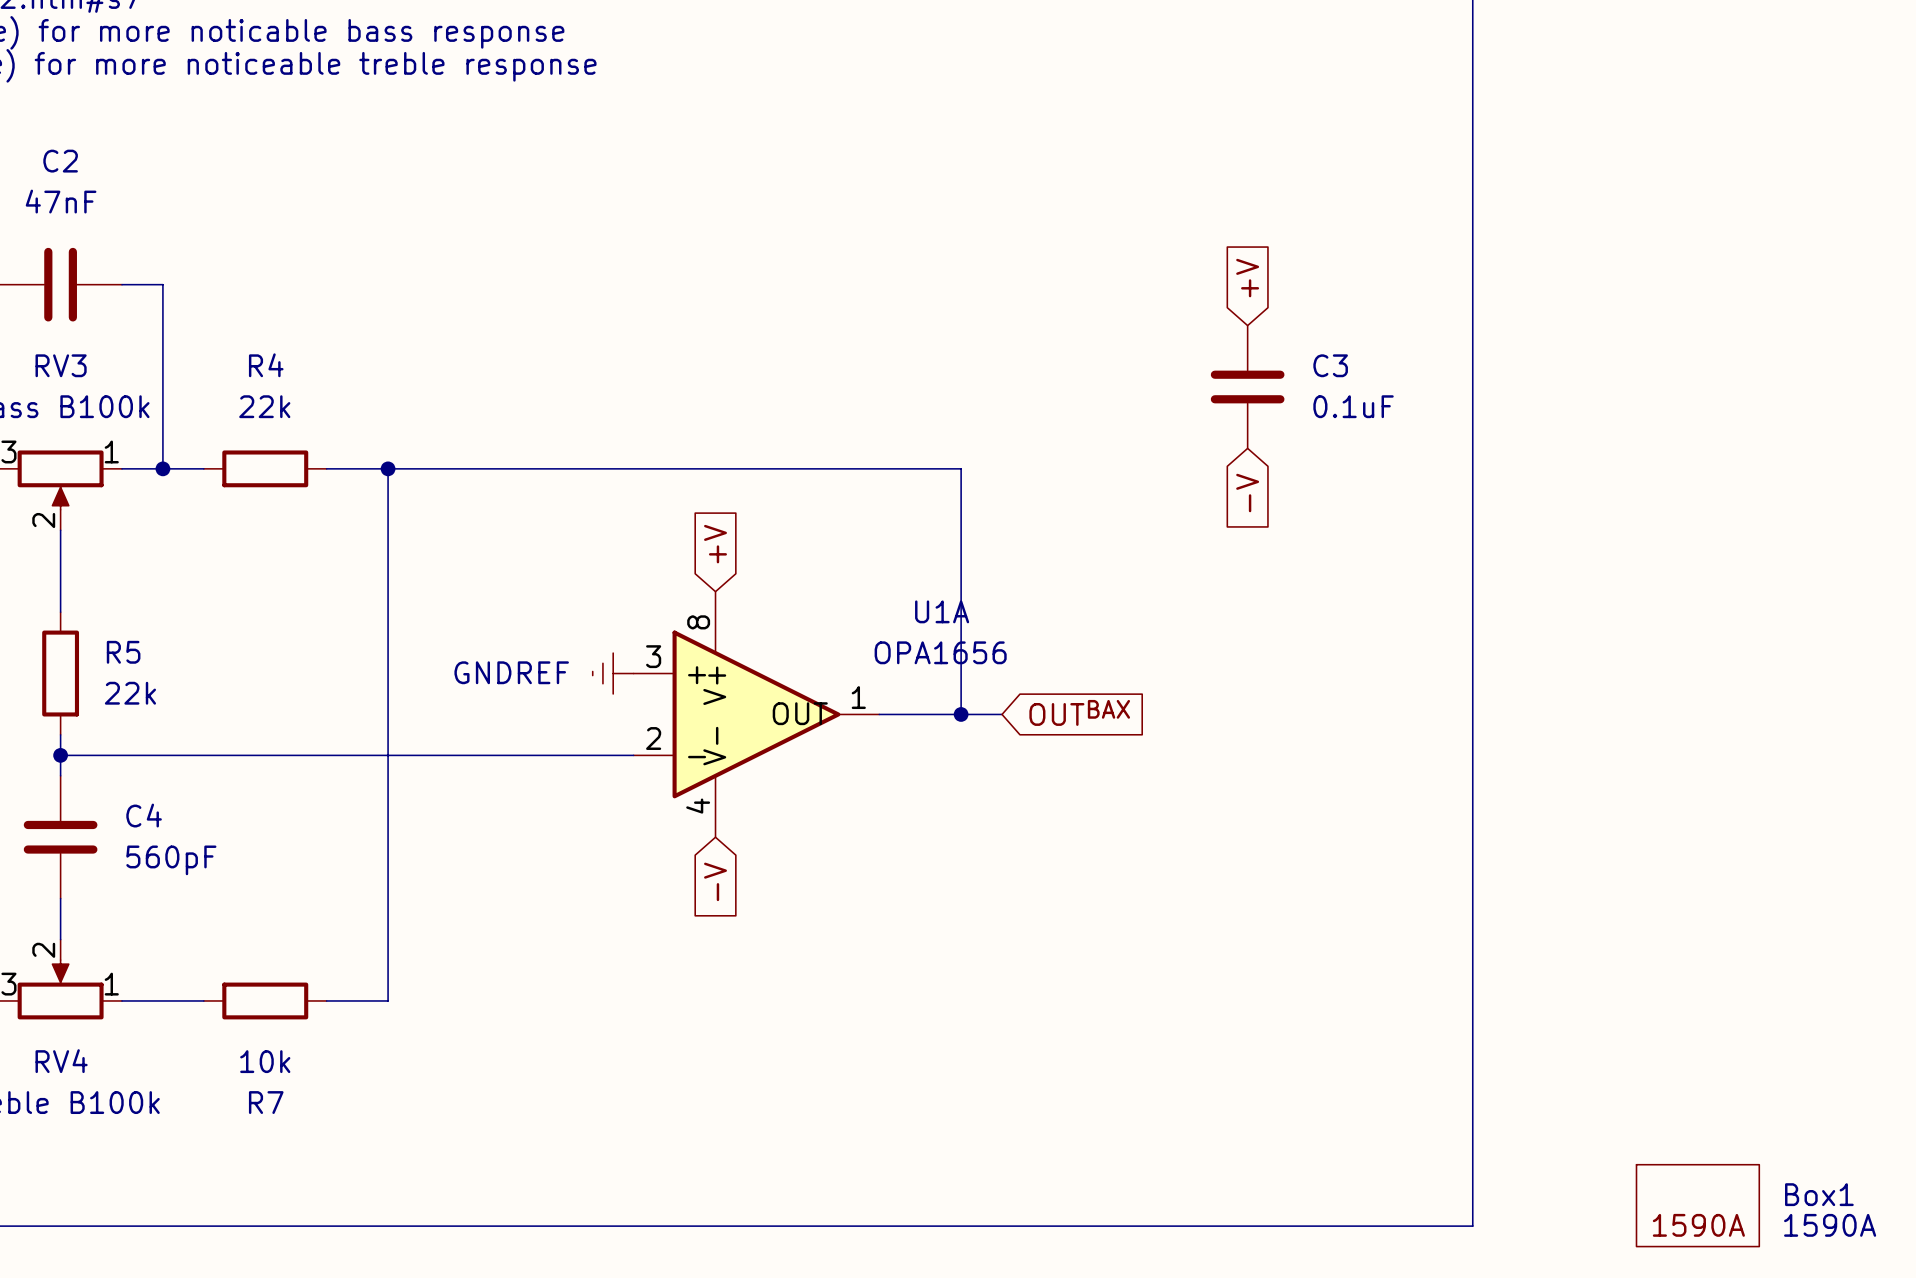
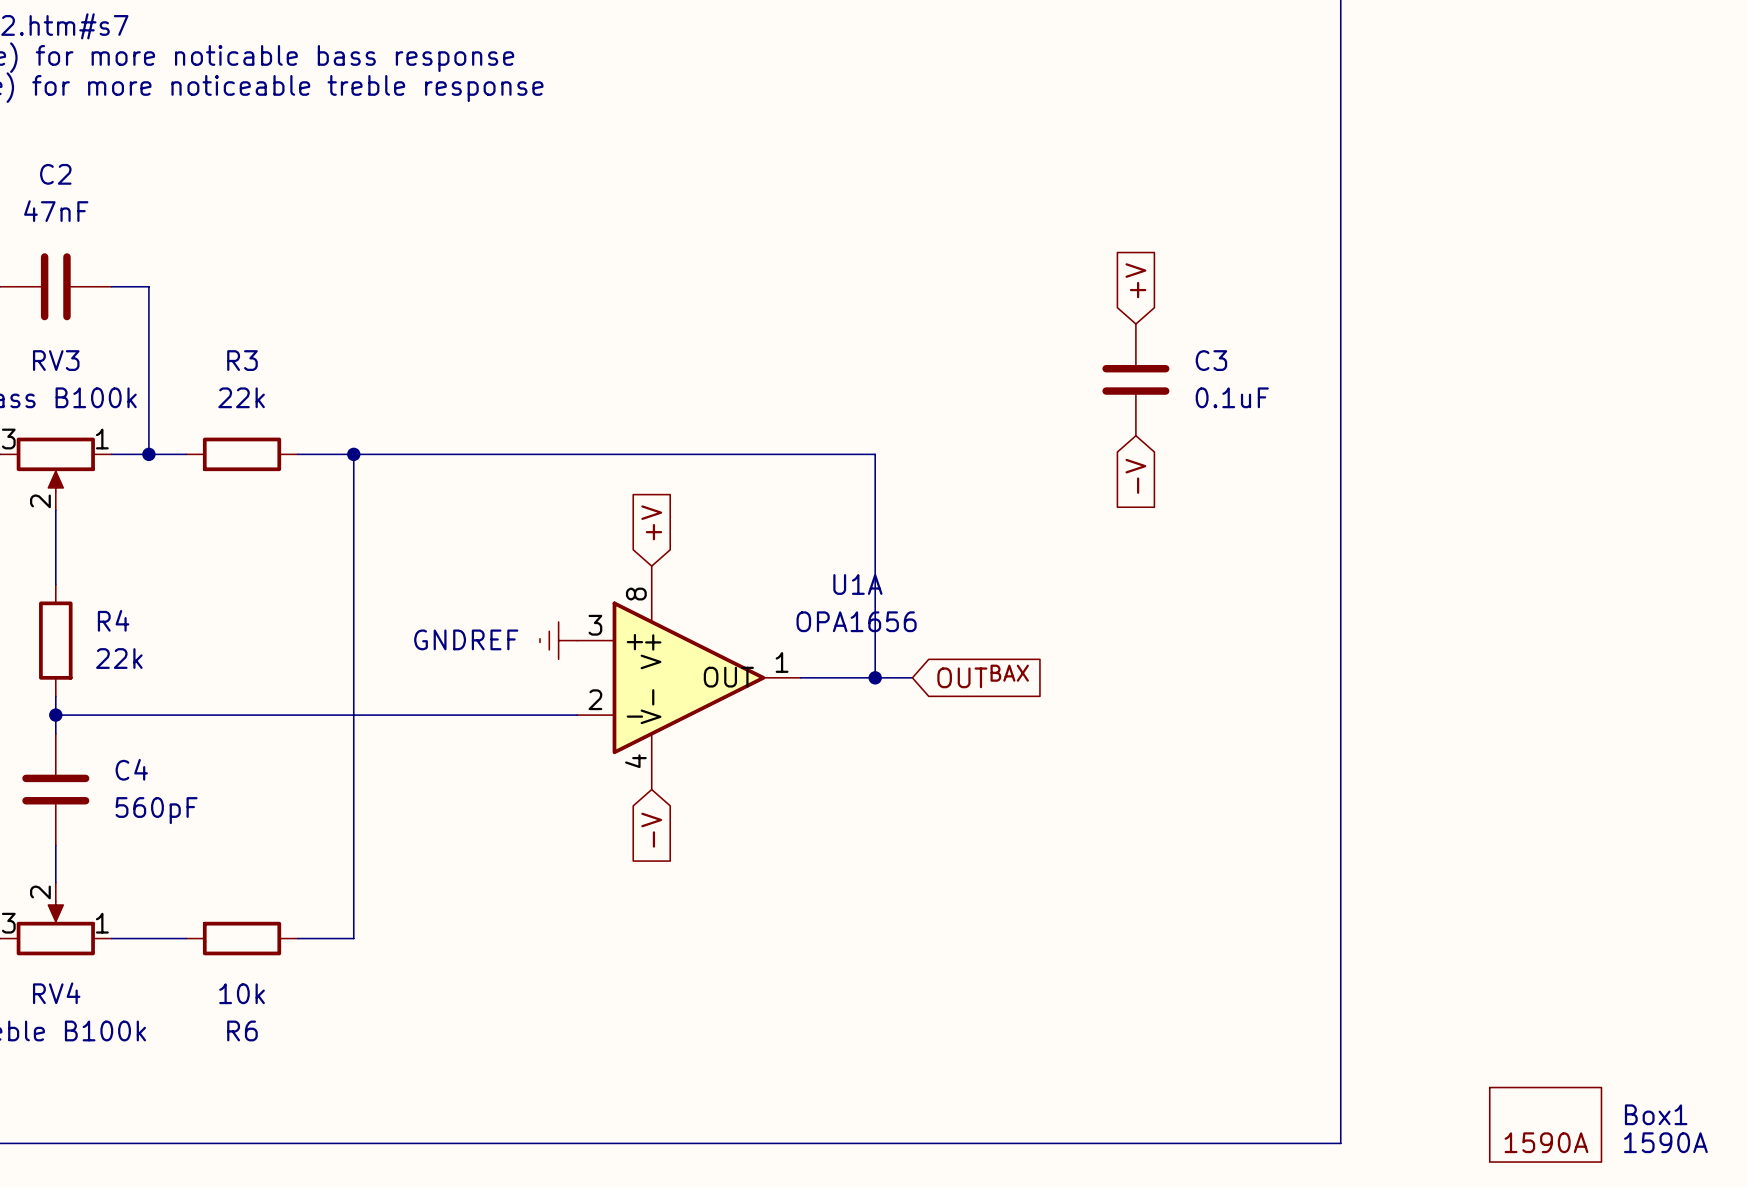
R4 name: R4 (266, 365) -> R3 (242, 360)
R5 name: R5 (123, 652) -> R4 (113, 620)
R7 name: R7 (266, 1102) -> R6 (242, 1030)

